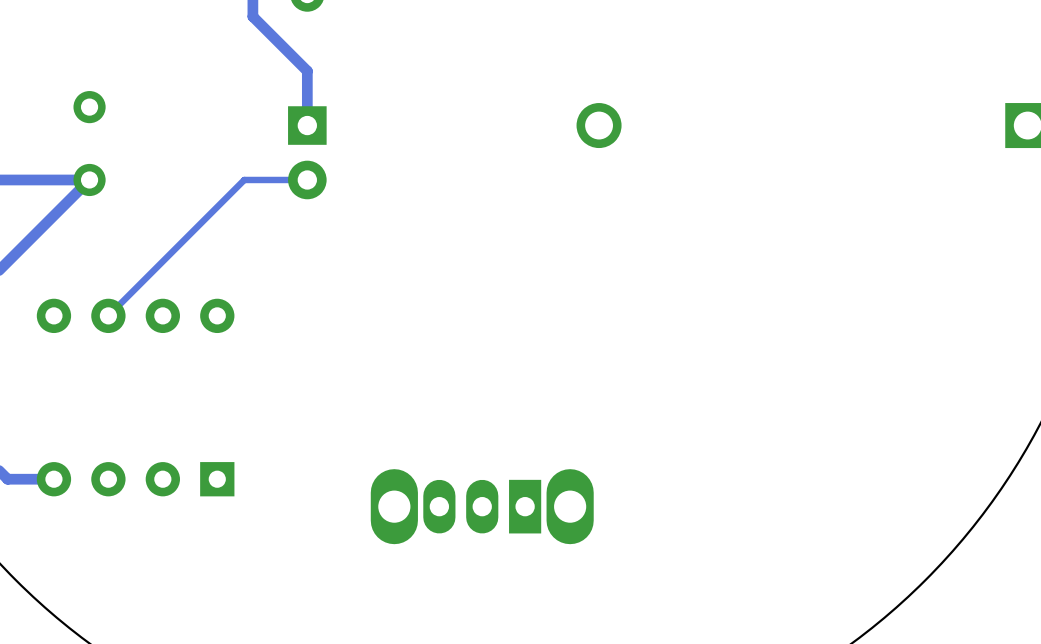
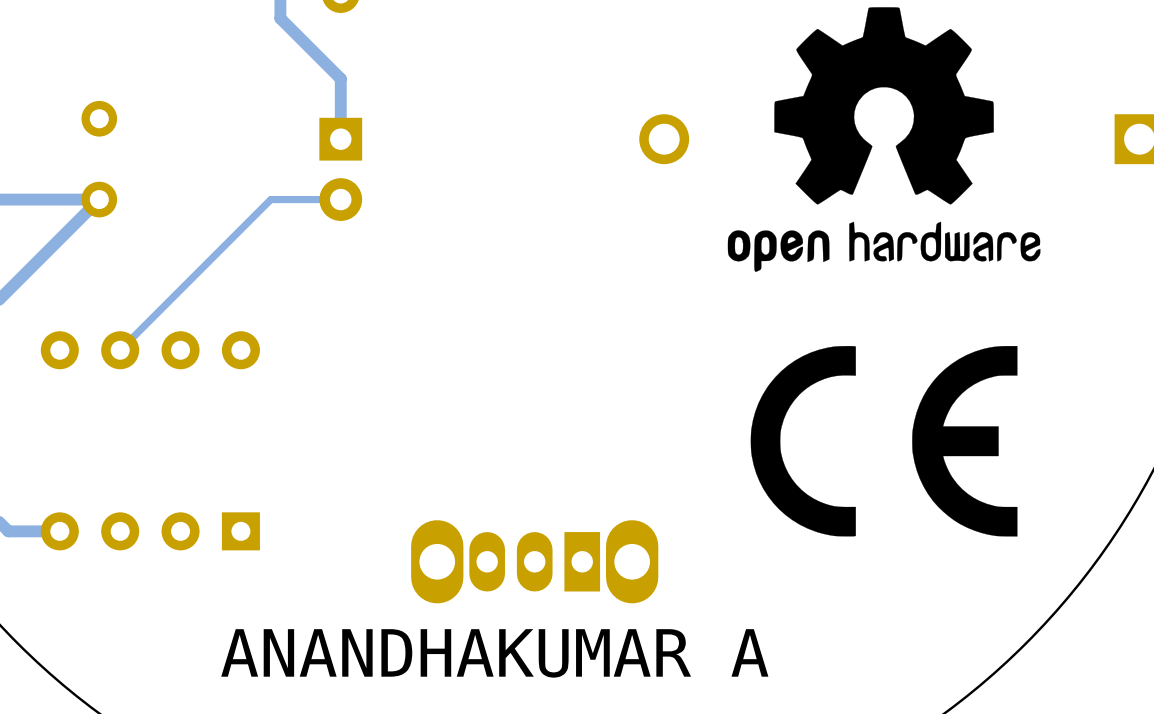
drawing: none -> [727, 7, 1041, 272]
drawing: none -> [750, 345, 1018, 537]
text: none -> ANANDHAKUMAR A (494, 653)

